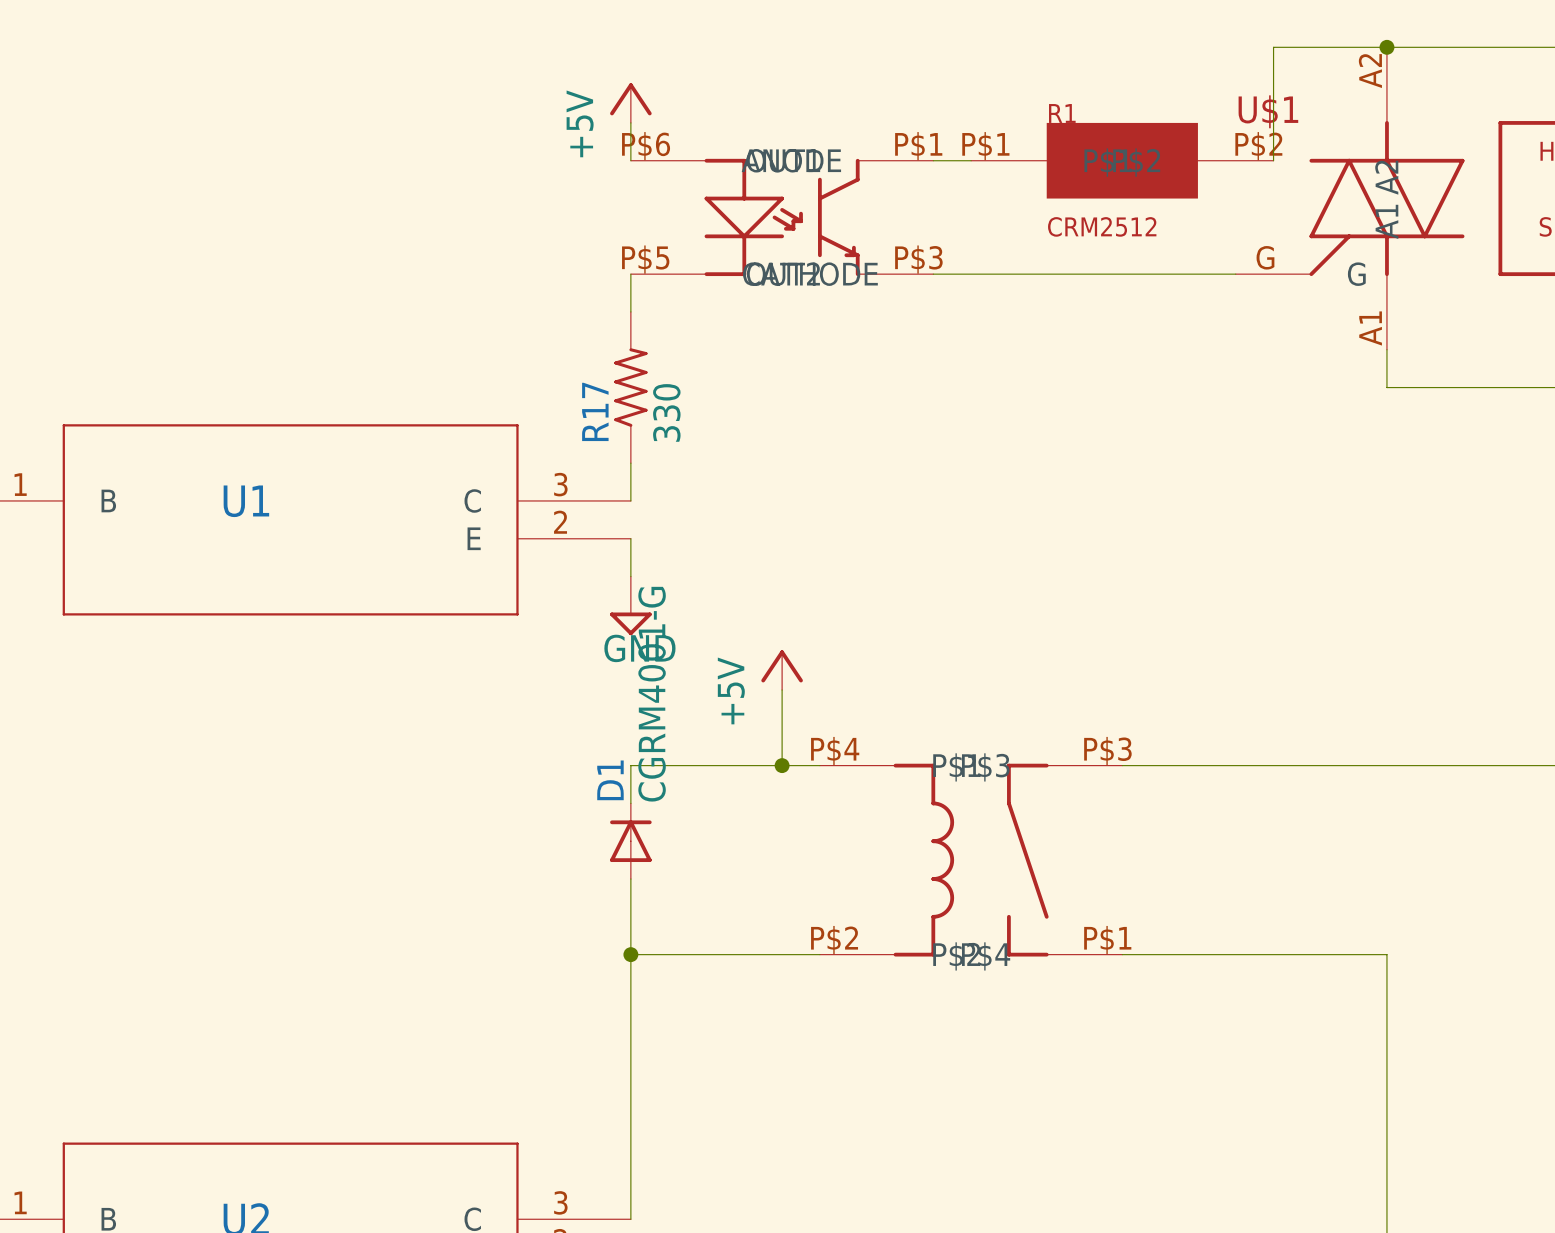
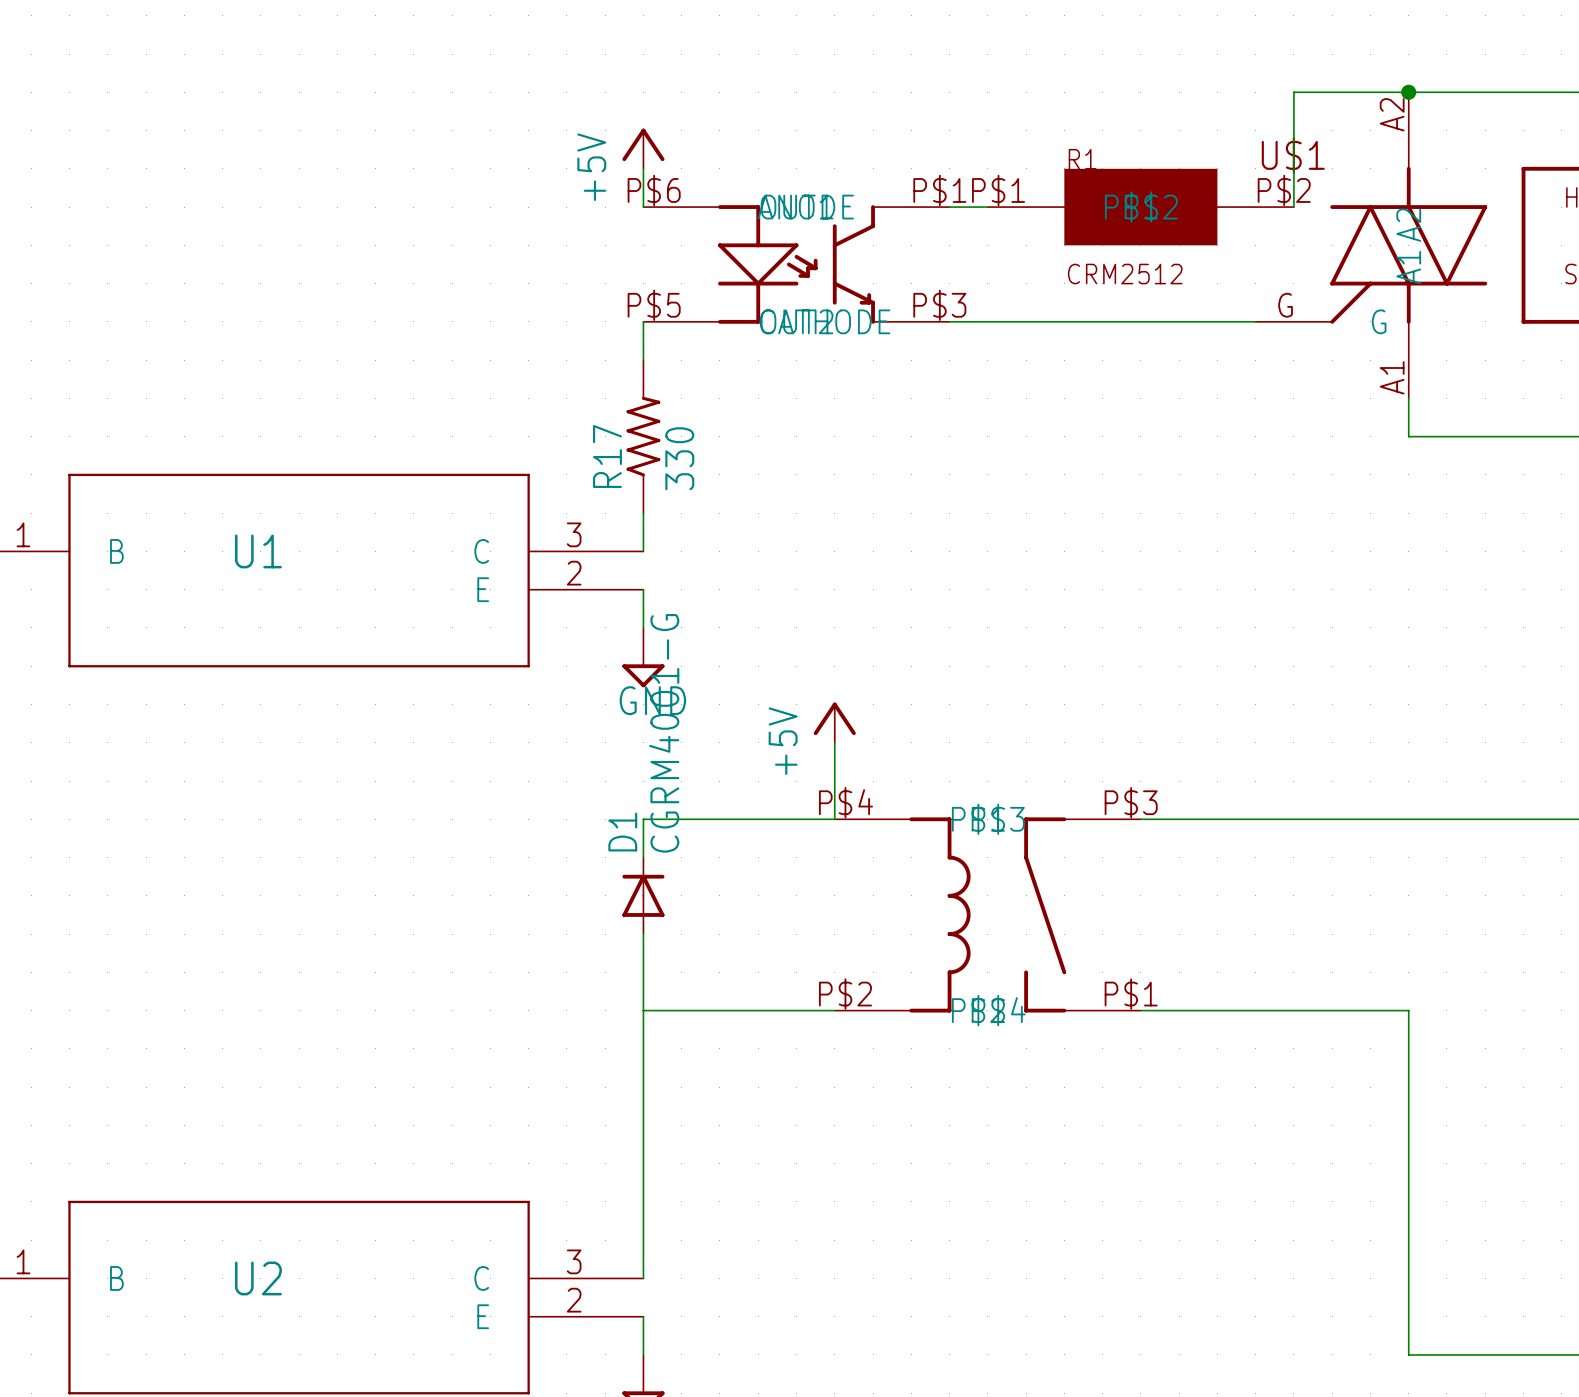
power symbol position: +5V (782, 670) -> +5V (834, 722)
wire: (782, 690) (782, 765) -> (834, 742) (834, 819)
junction: (782, 765) -> none
junction: (630, 954) -> none

